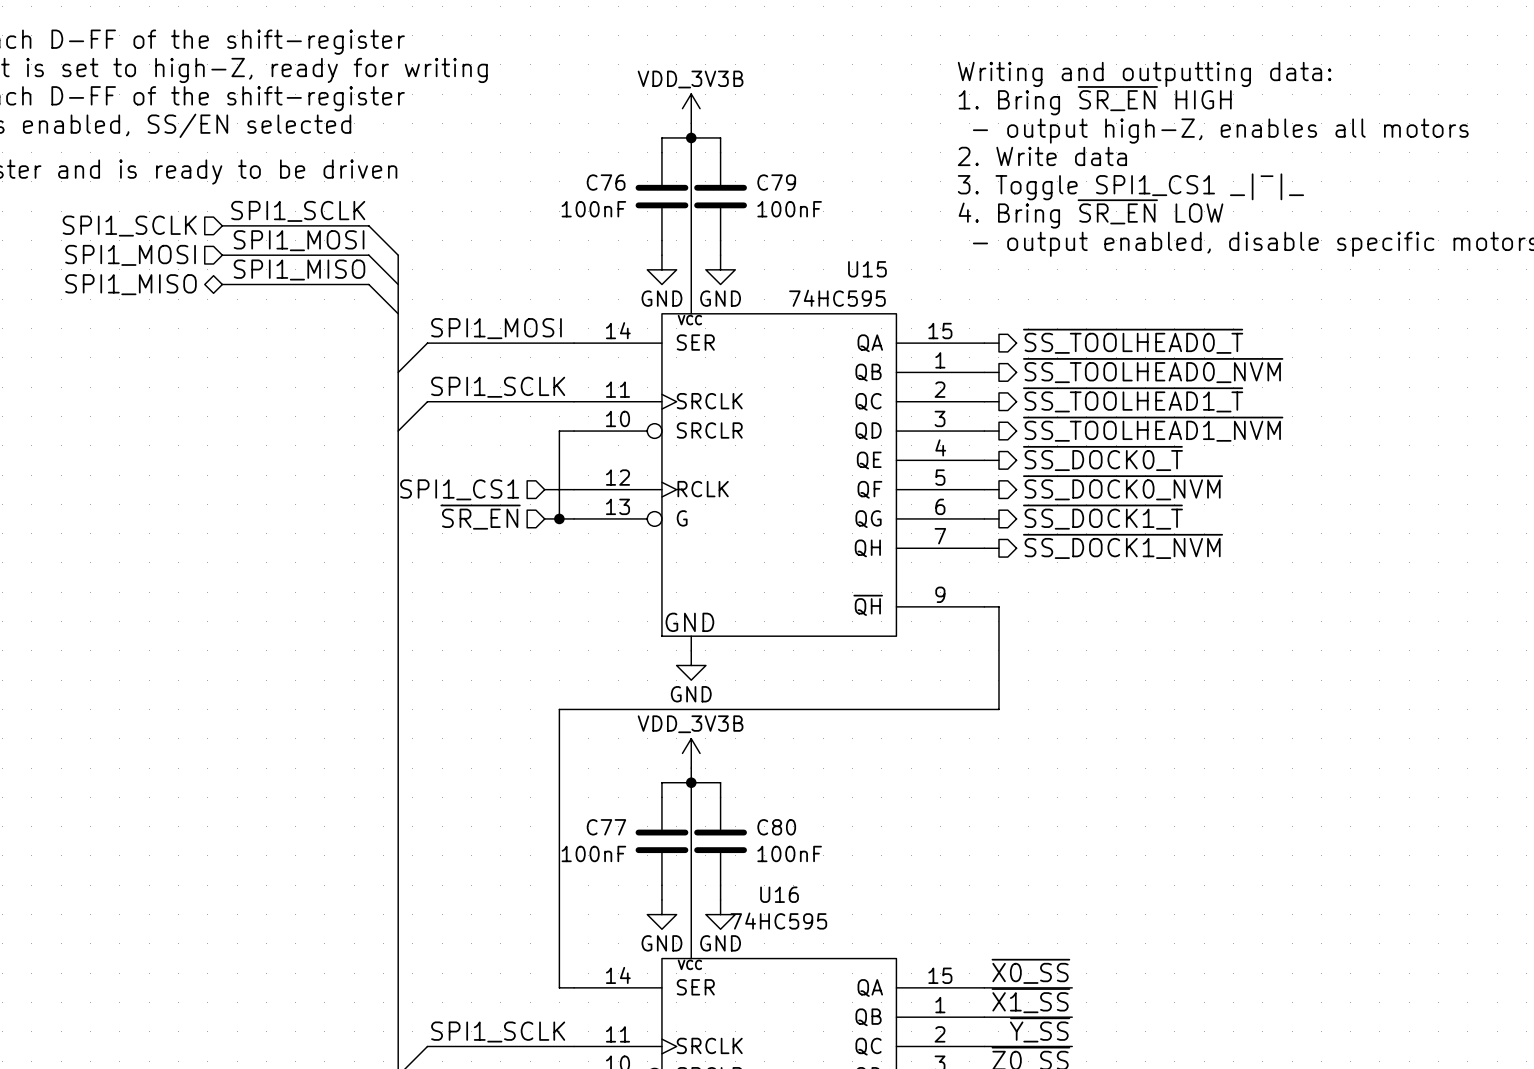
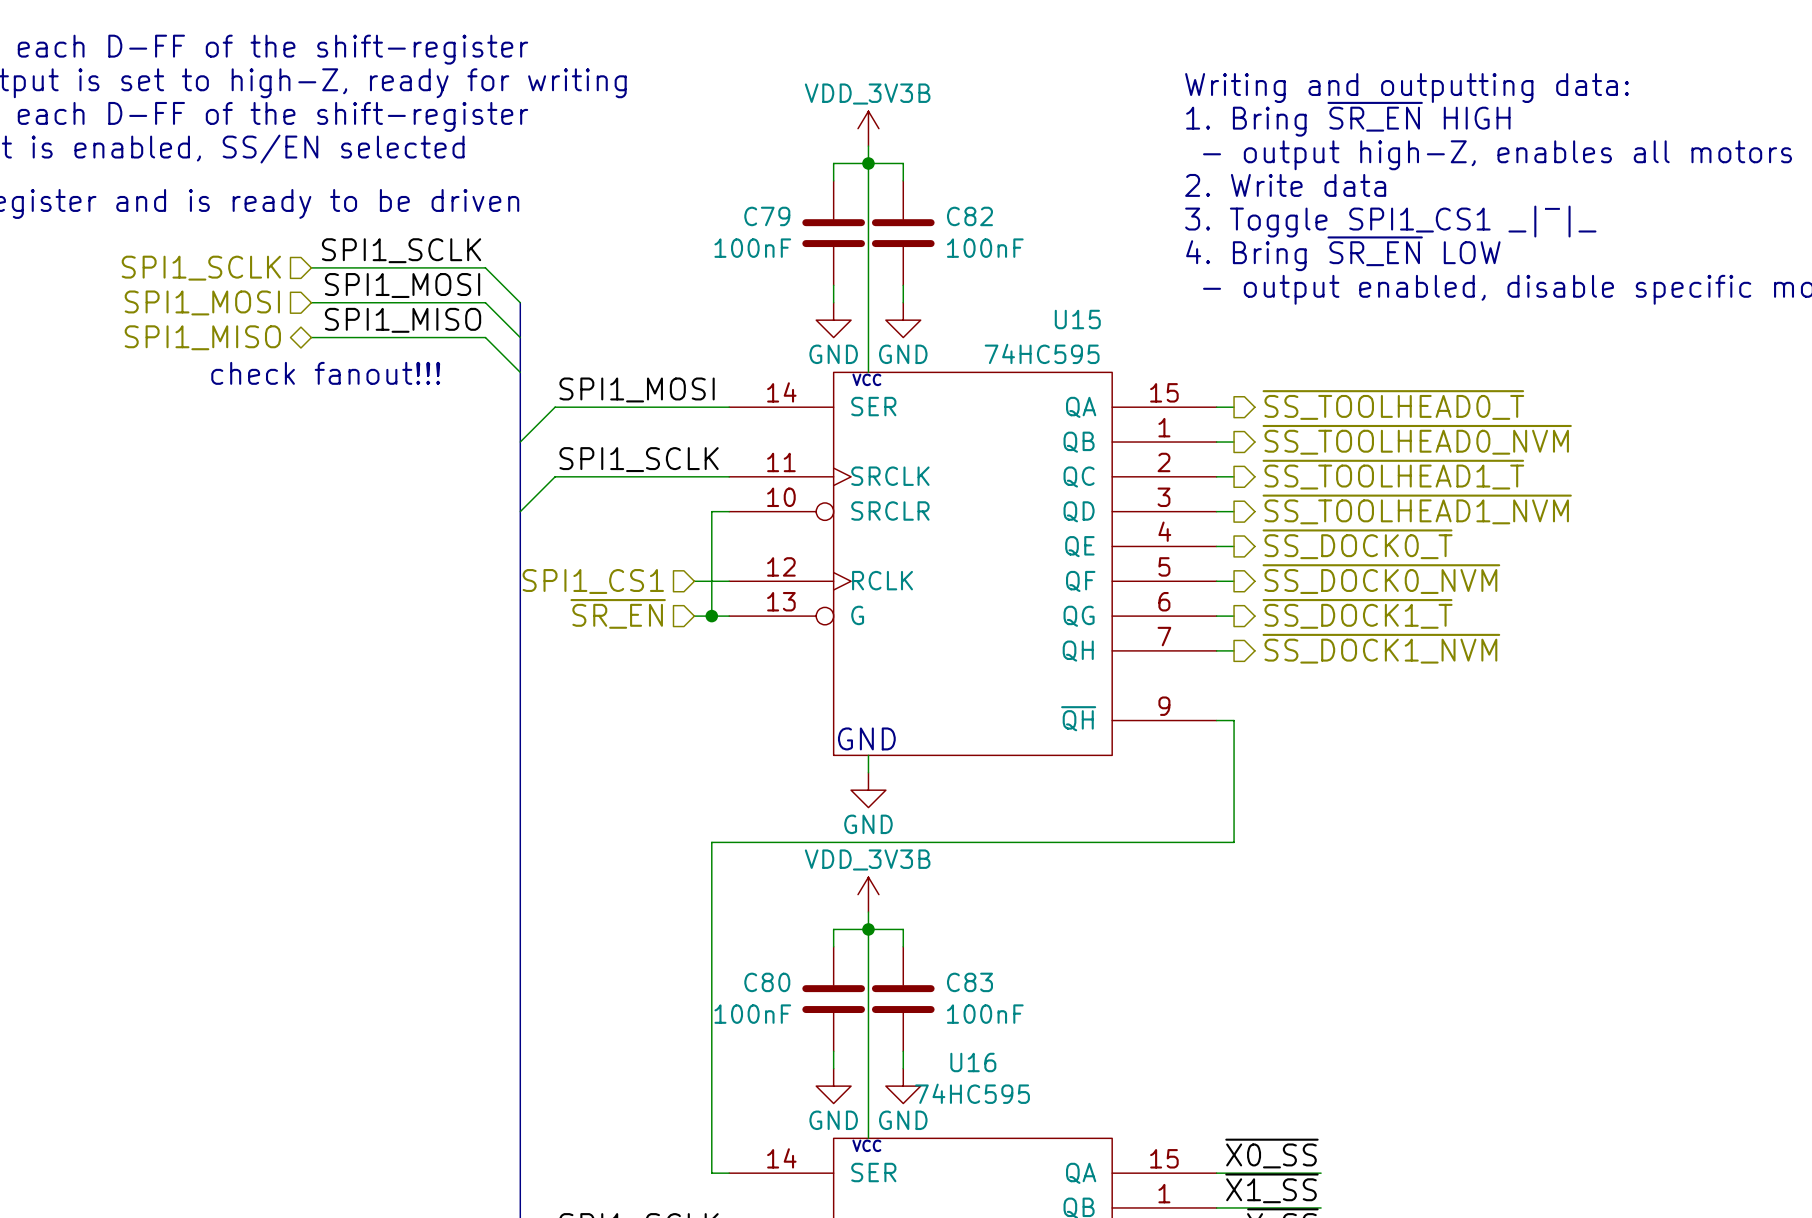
C76 name: C76 (606, 182) -> C79 (767, 216)
C79 name: C79 (776, 182) -> C82 (969, 216)
text: none -> check fanout!!! (325, 373)
C77 name: C77 (606, 827) -> C80 (767, 982)
C80 name: C80 (776, 827) -> C83 (969, 982)

